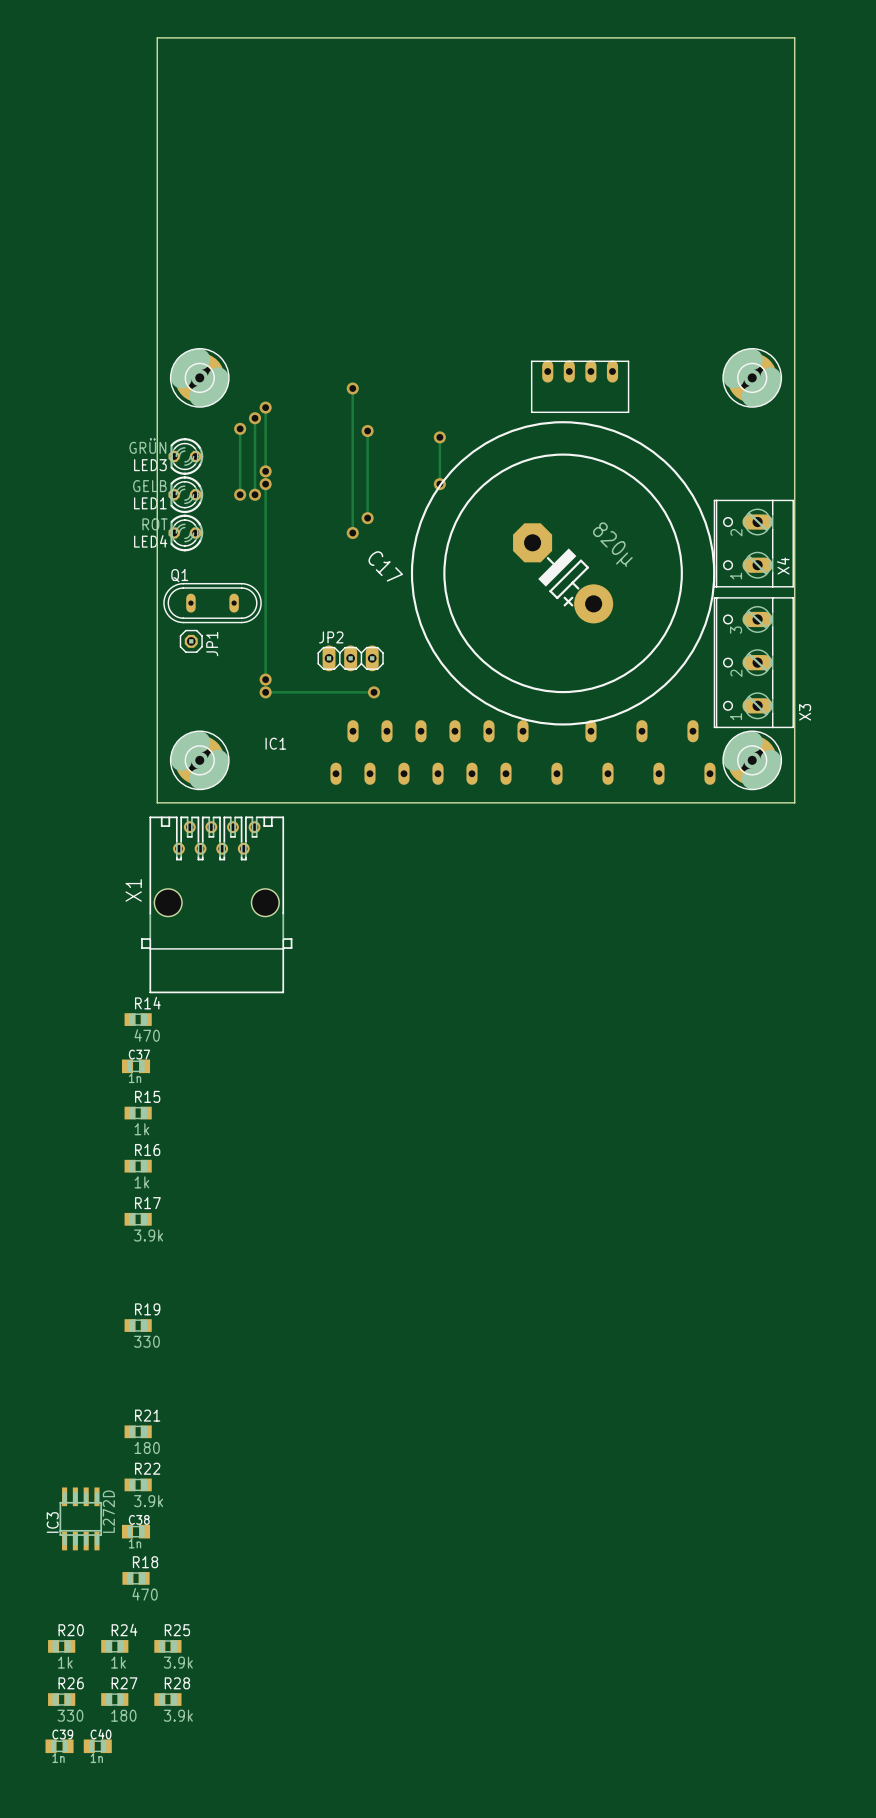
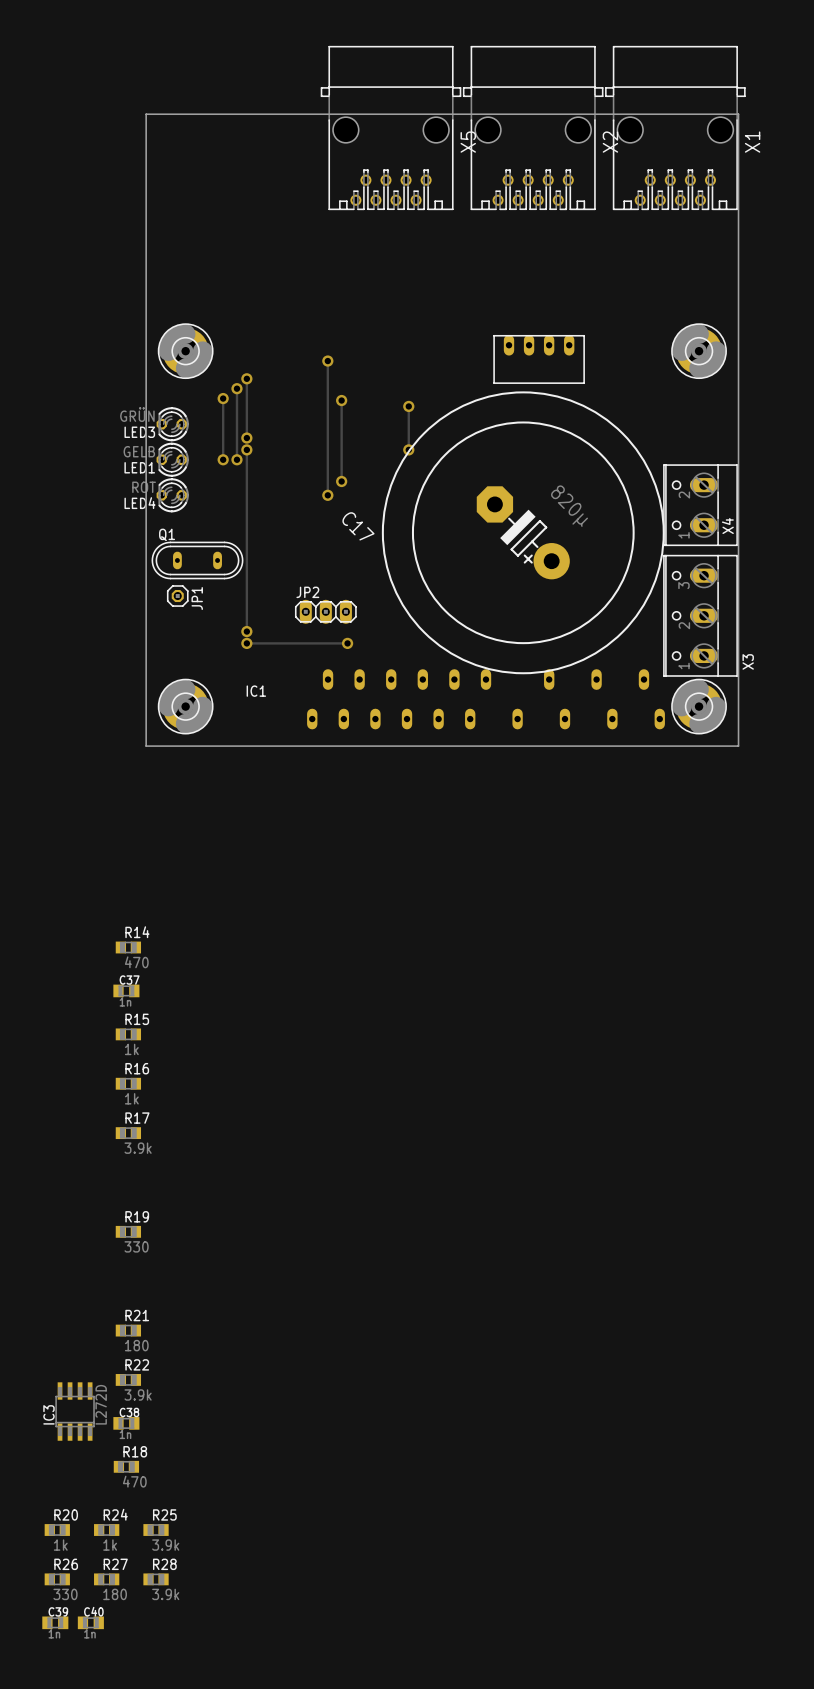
board edge: (157, 122) (157, 37) (794, 37) (794, 122) -> (146, 114) (738, 114)
X5: none -> (391, 128)
X2: none -> (533, 128)
X1 rotation: 0° (216, 904) -> 180° (675, 128)
X1 position: (216, 904) -> (675, 128)

